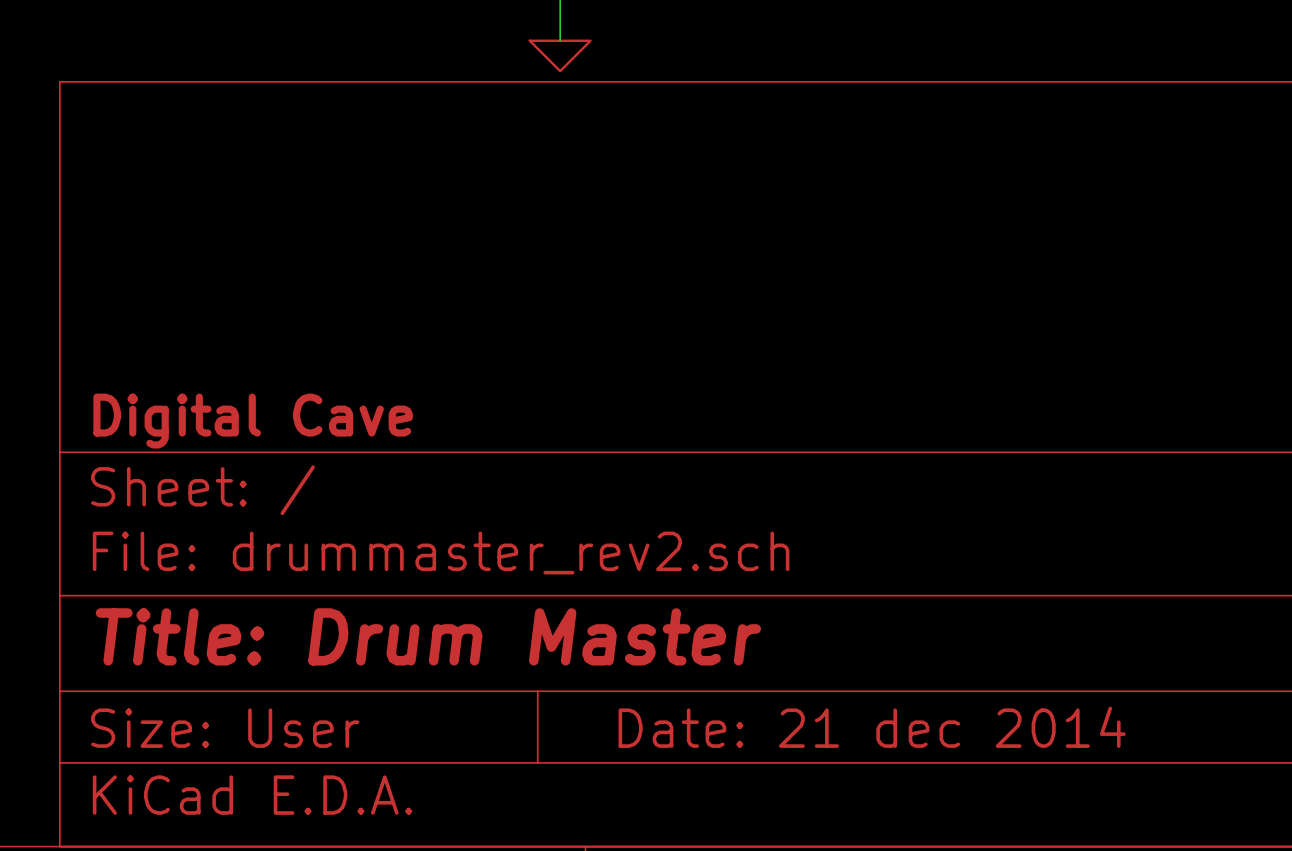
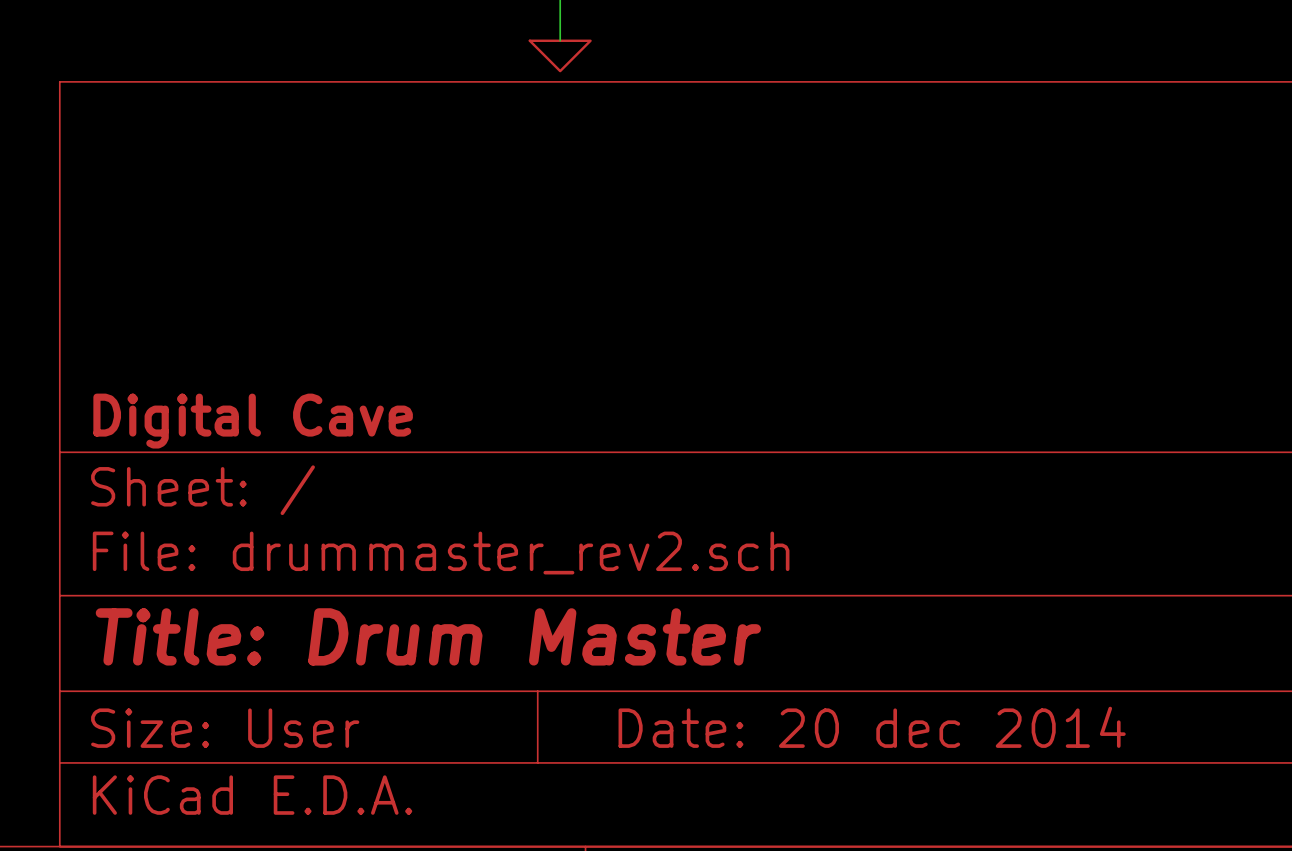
title block: Date: 21 dec 2014 (872, 727) -> Date: 20 dec 2014 (872, 727)

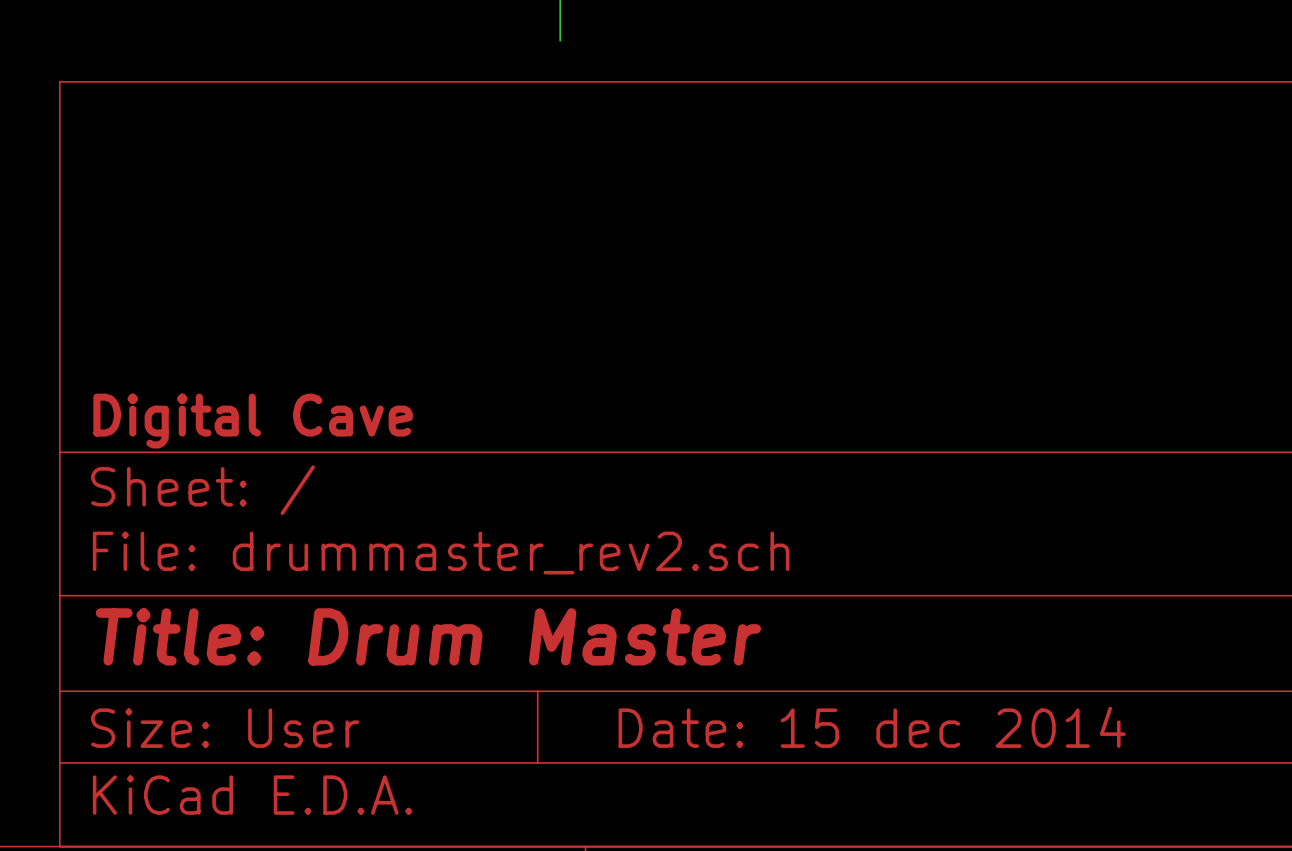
power symbol: (560, 55) -> none
title block: Date: 20 dec 2014 (872, 727) -> Date: 15 dec 2014 (872, 727)

